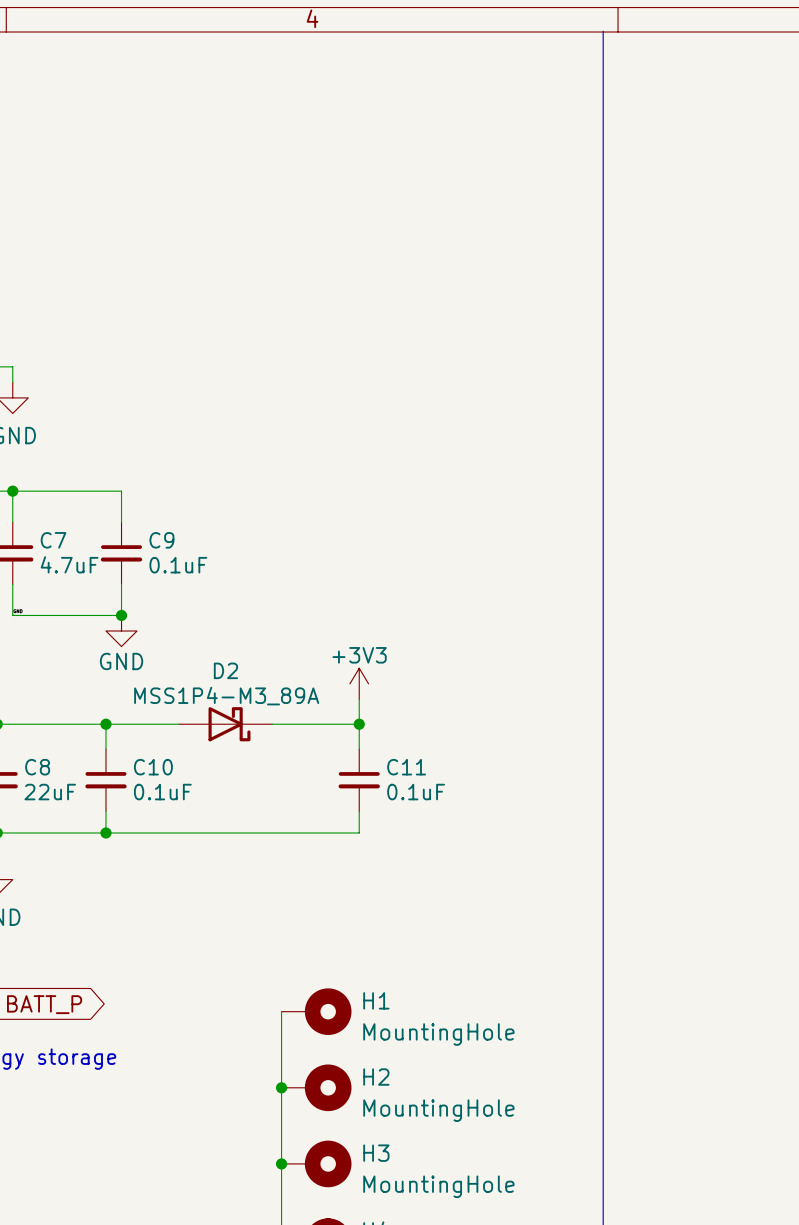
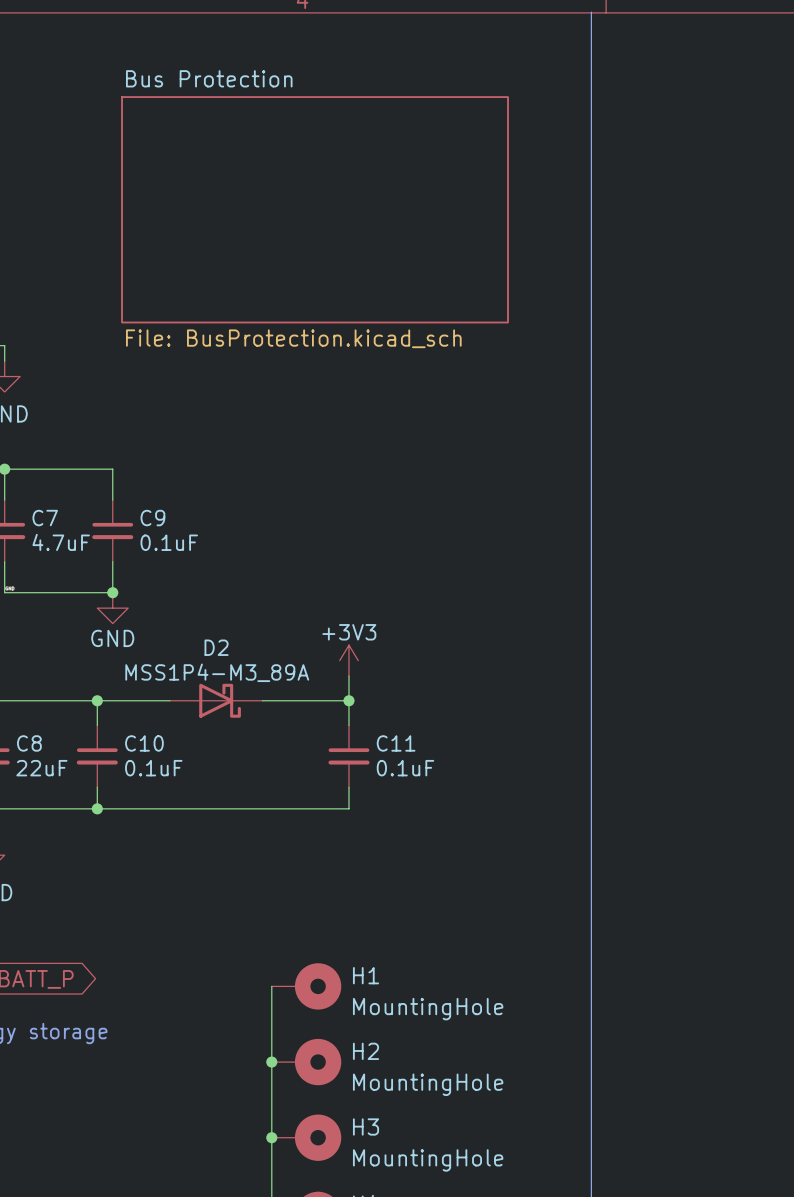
sheet Bus Protection: none -> File: BusProtection.kicad_sch (315, 209)

